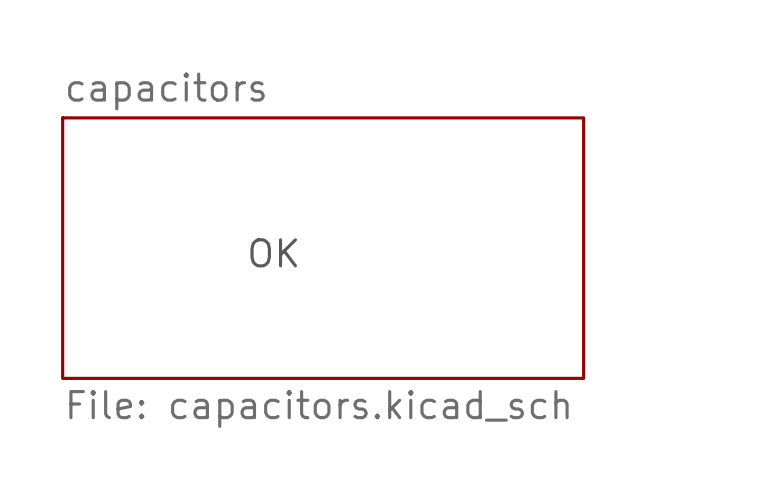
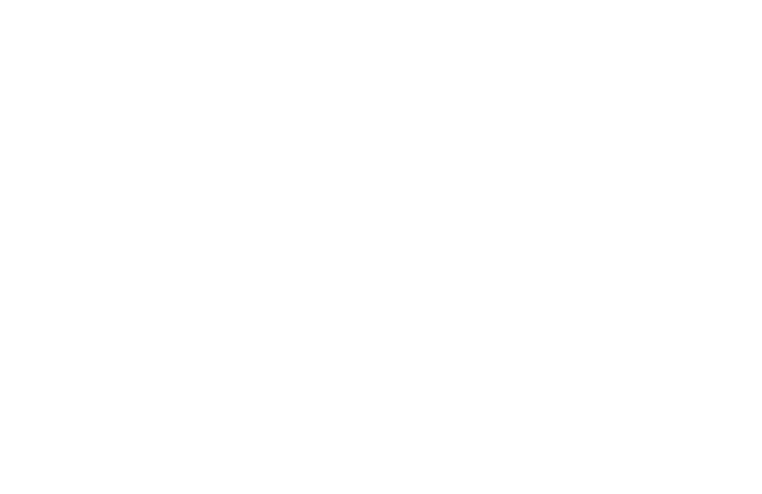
sheet capacitors: File: capacitors.kicad_sch (323, 248) -> none
text: OK (273, 252) -> none

